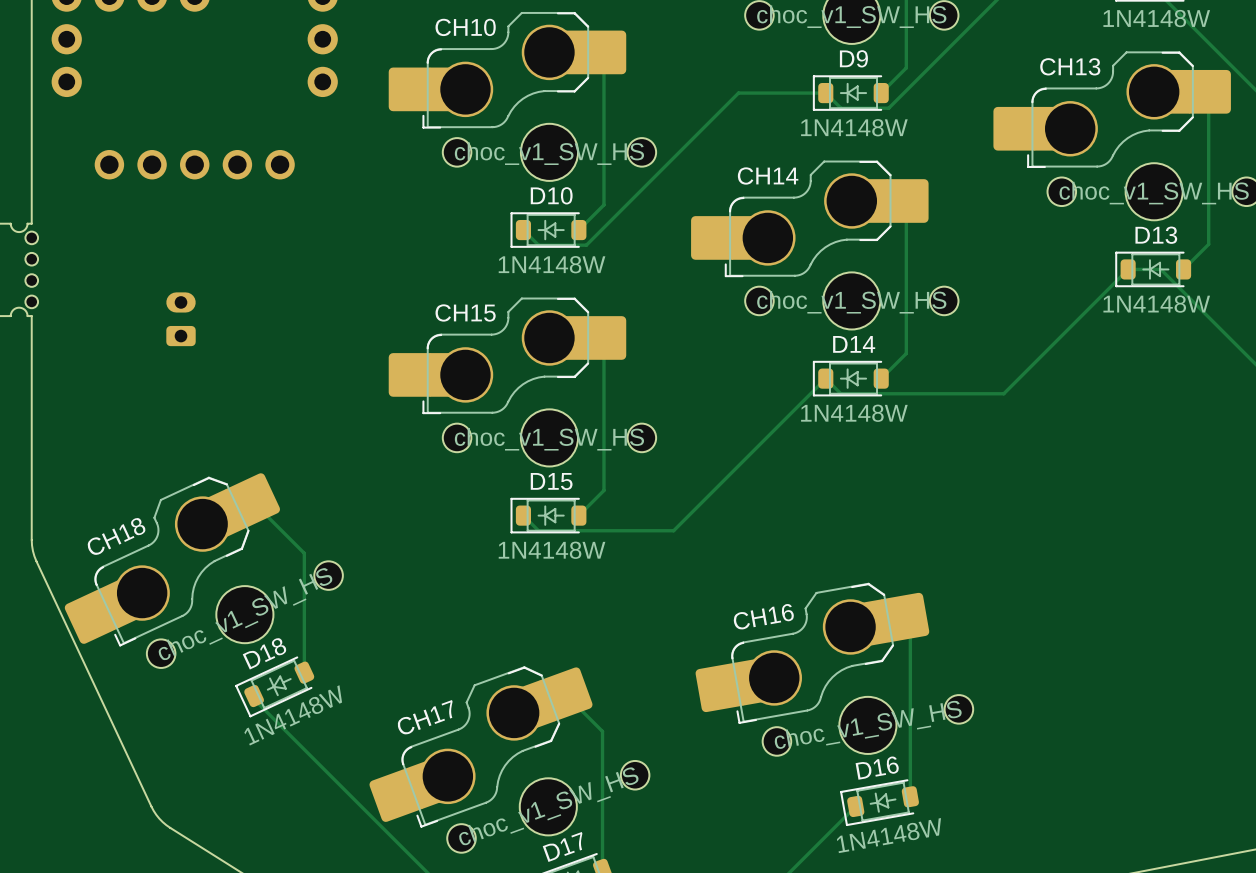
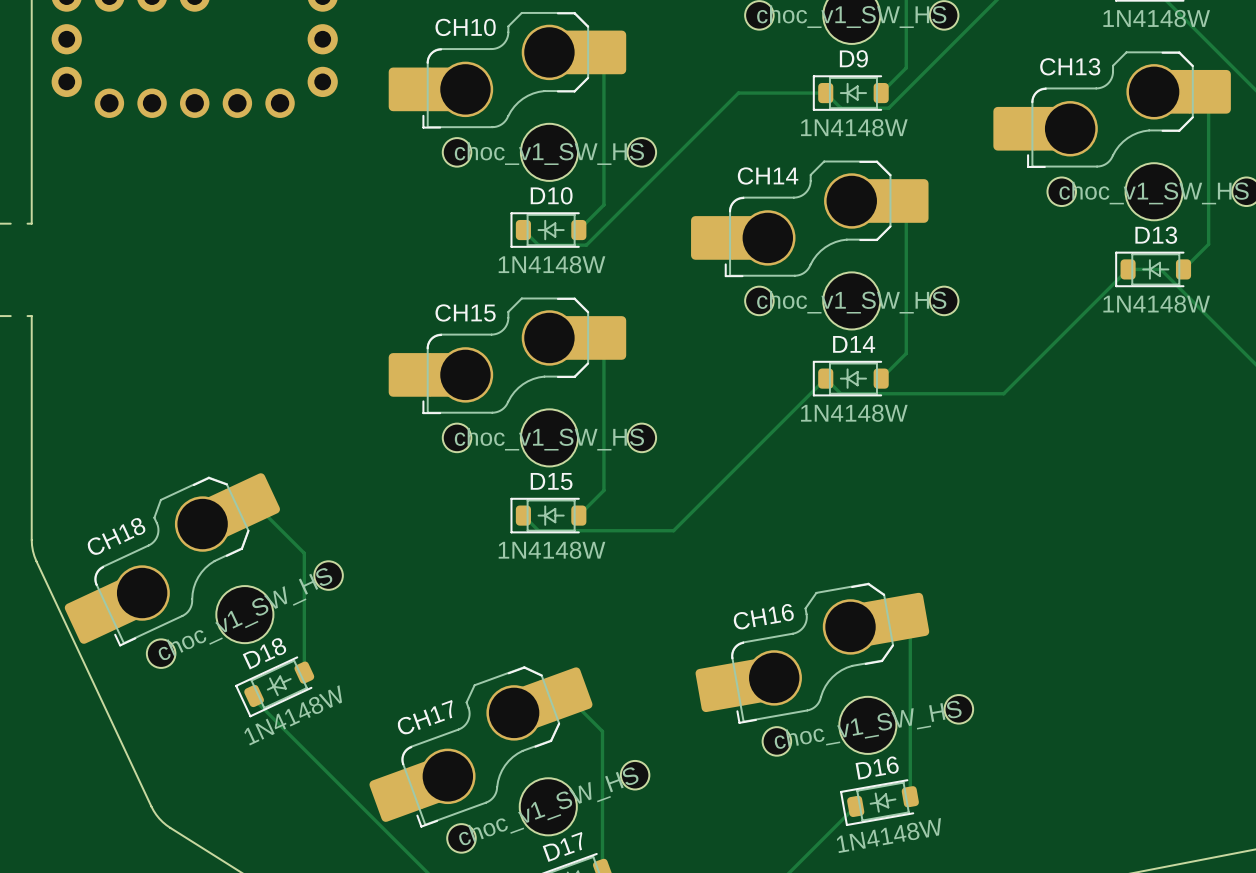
part position: (194, 164) -> (194, 103)
part: (24, 269) -> none
part: (181, 319) -> none

